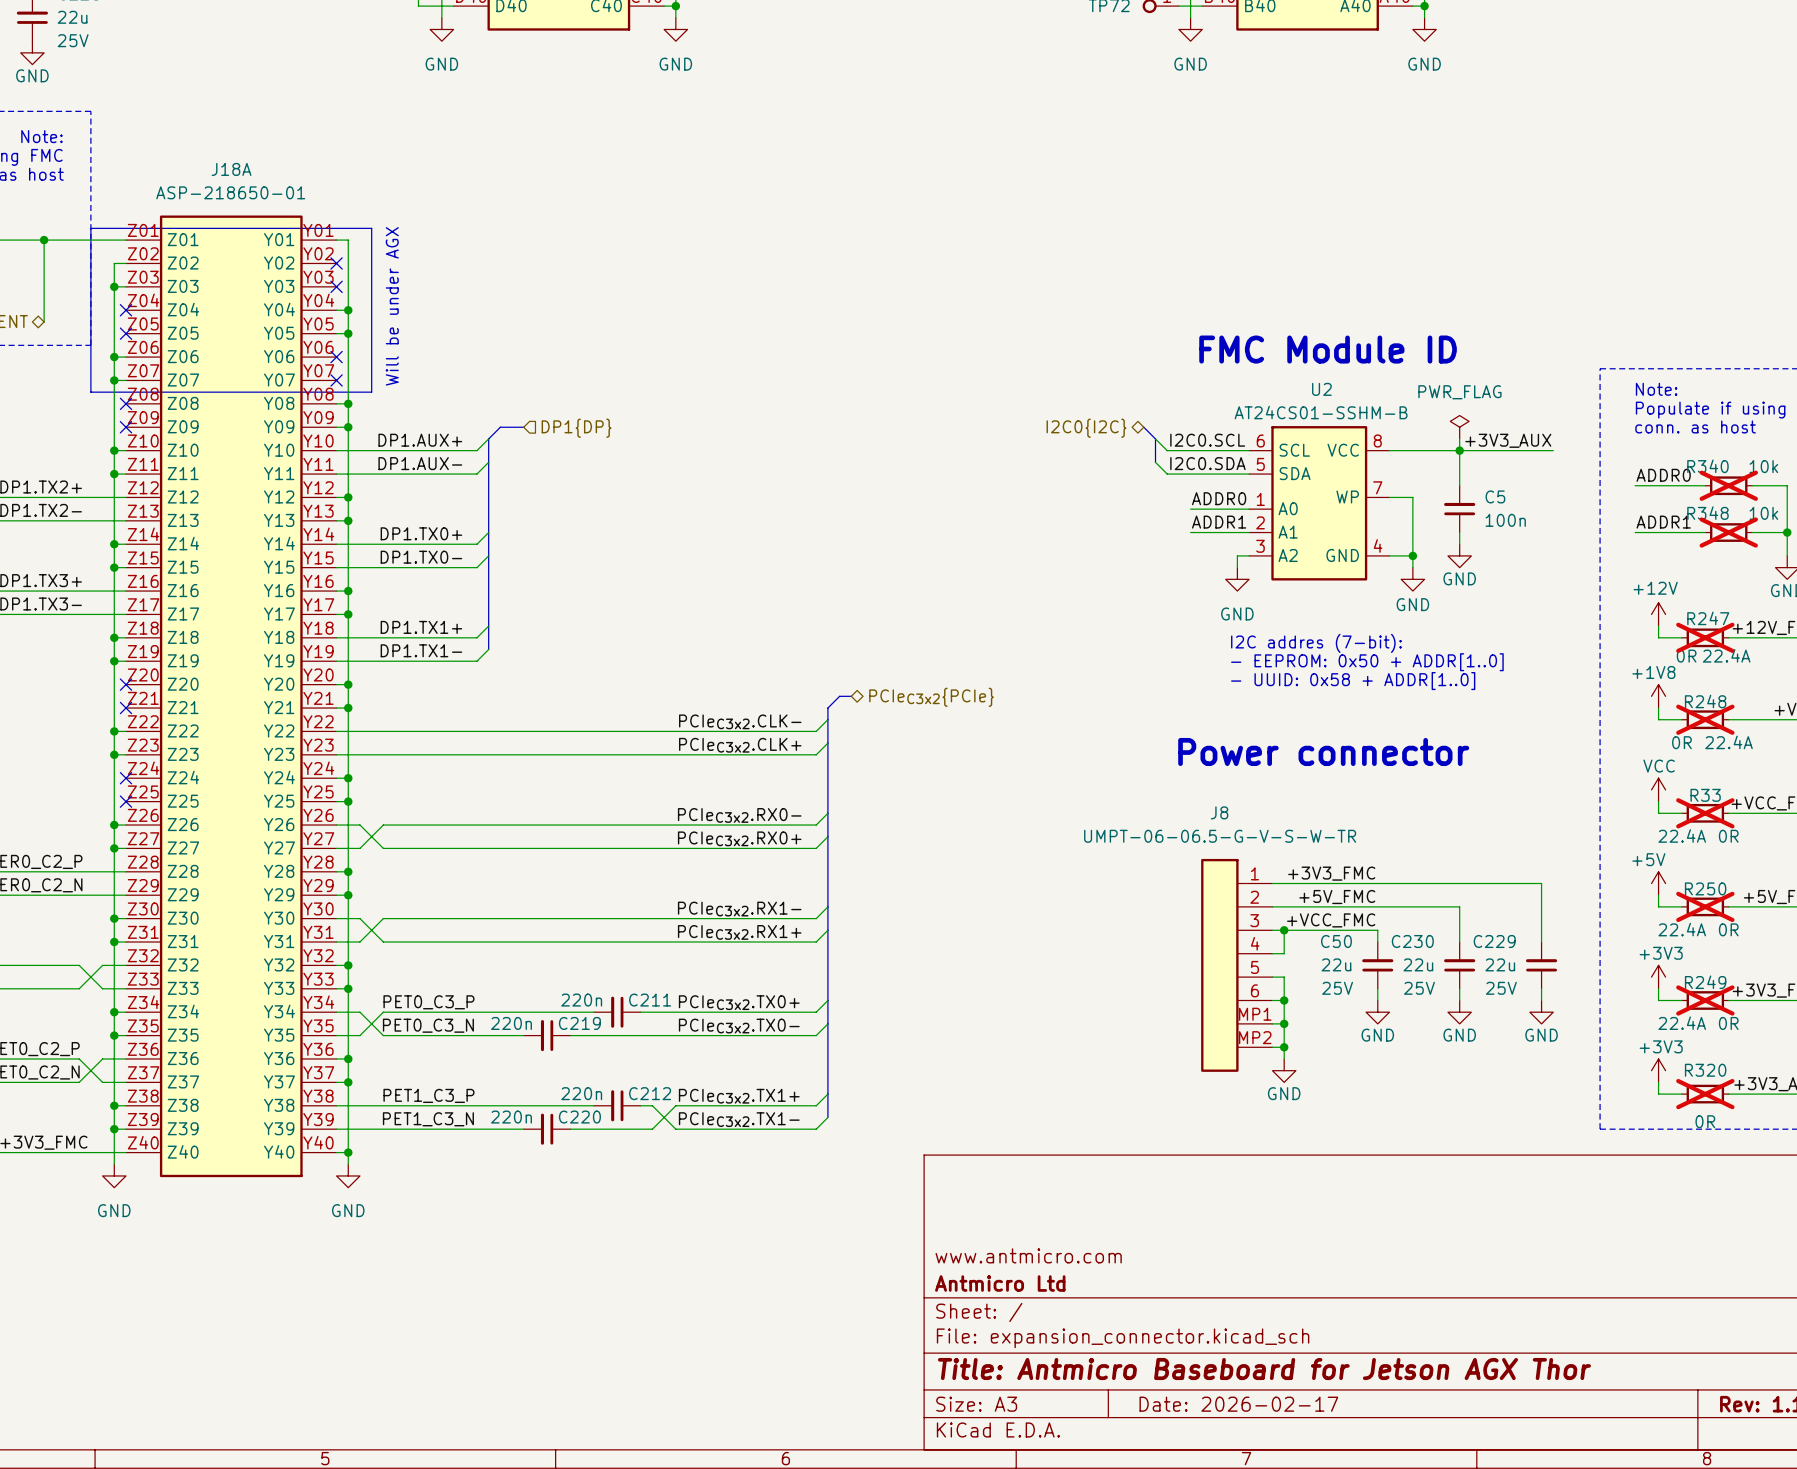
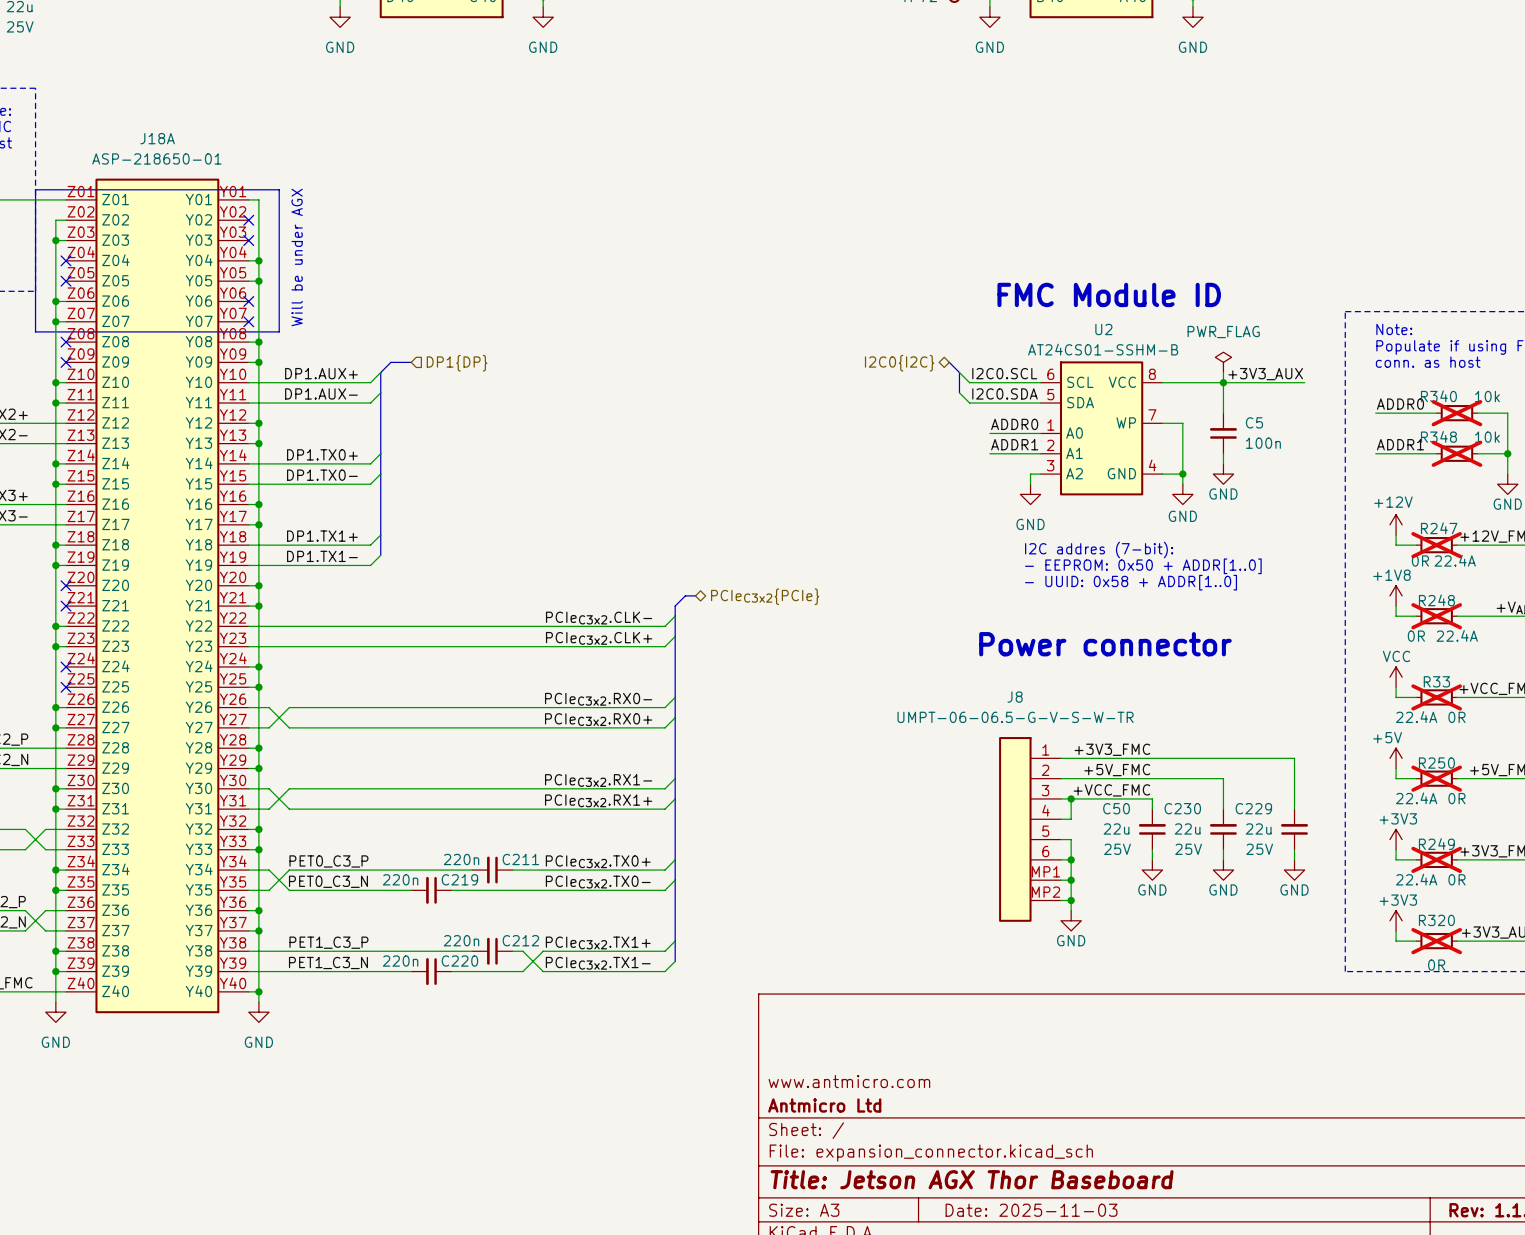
title block: Title: Antmicro Baseboard for Jetson AGX Thor (1264, 1369) -> Title: Jetson AGX Thor Baseboard (972, 1179)
title block: Date: 2026-02-17 (1238, 1404) -> Date: 2025-11-03 (1031, 1210)

